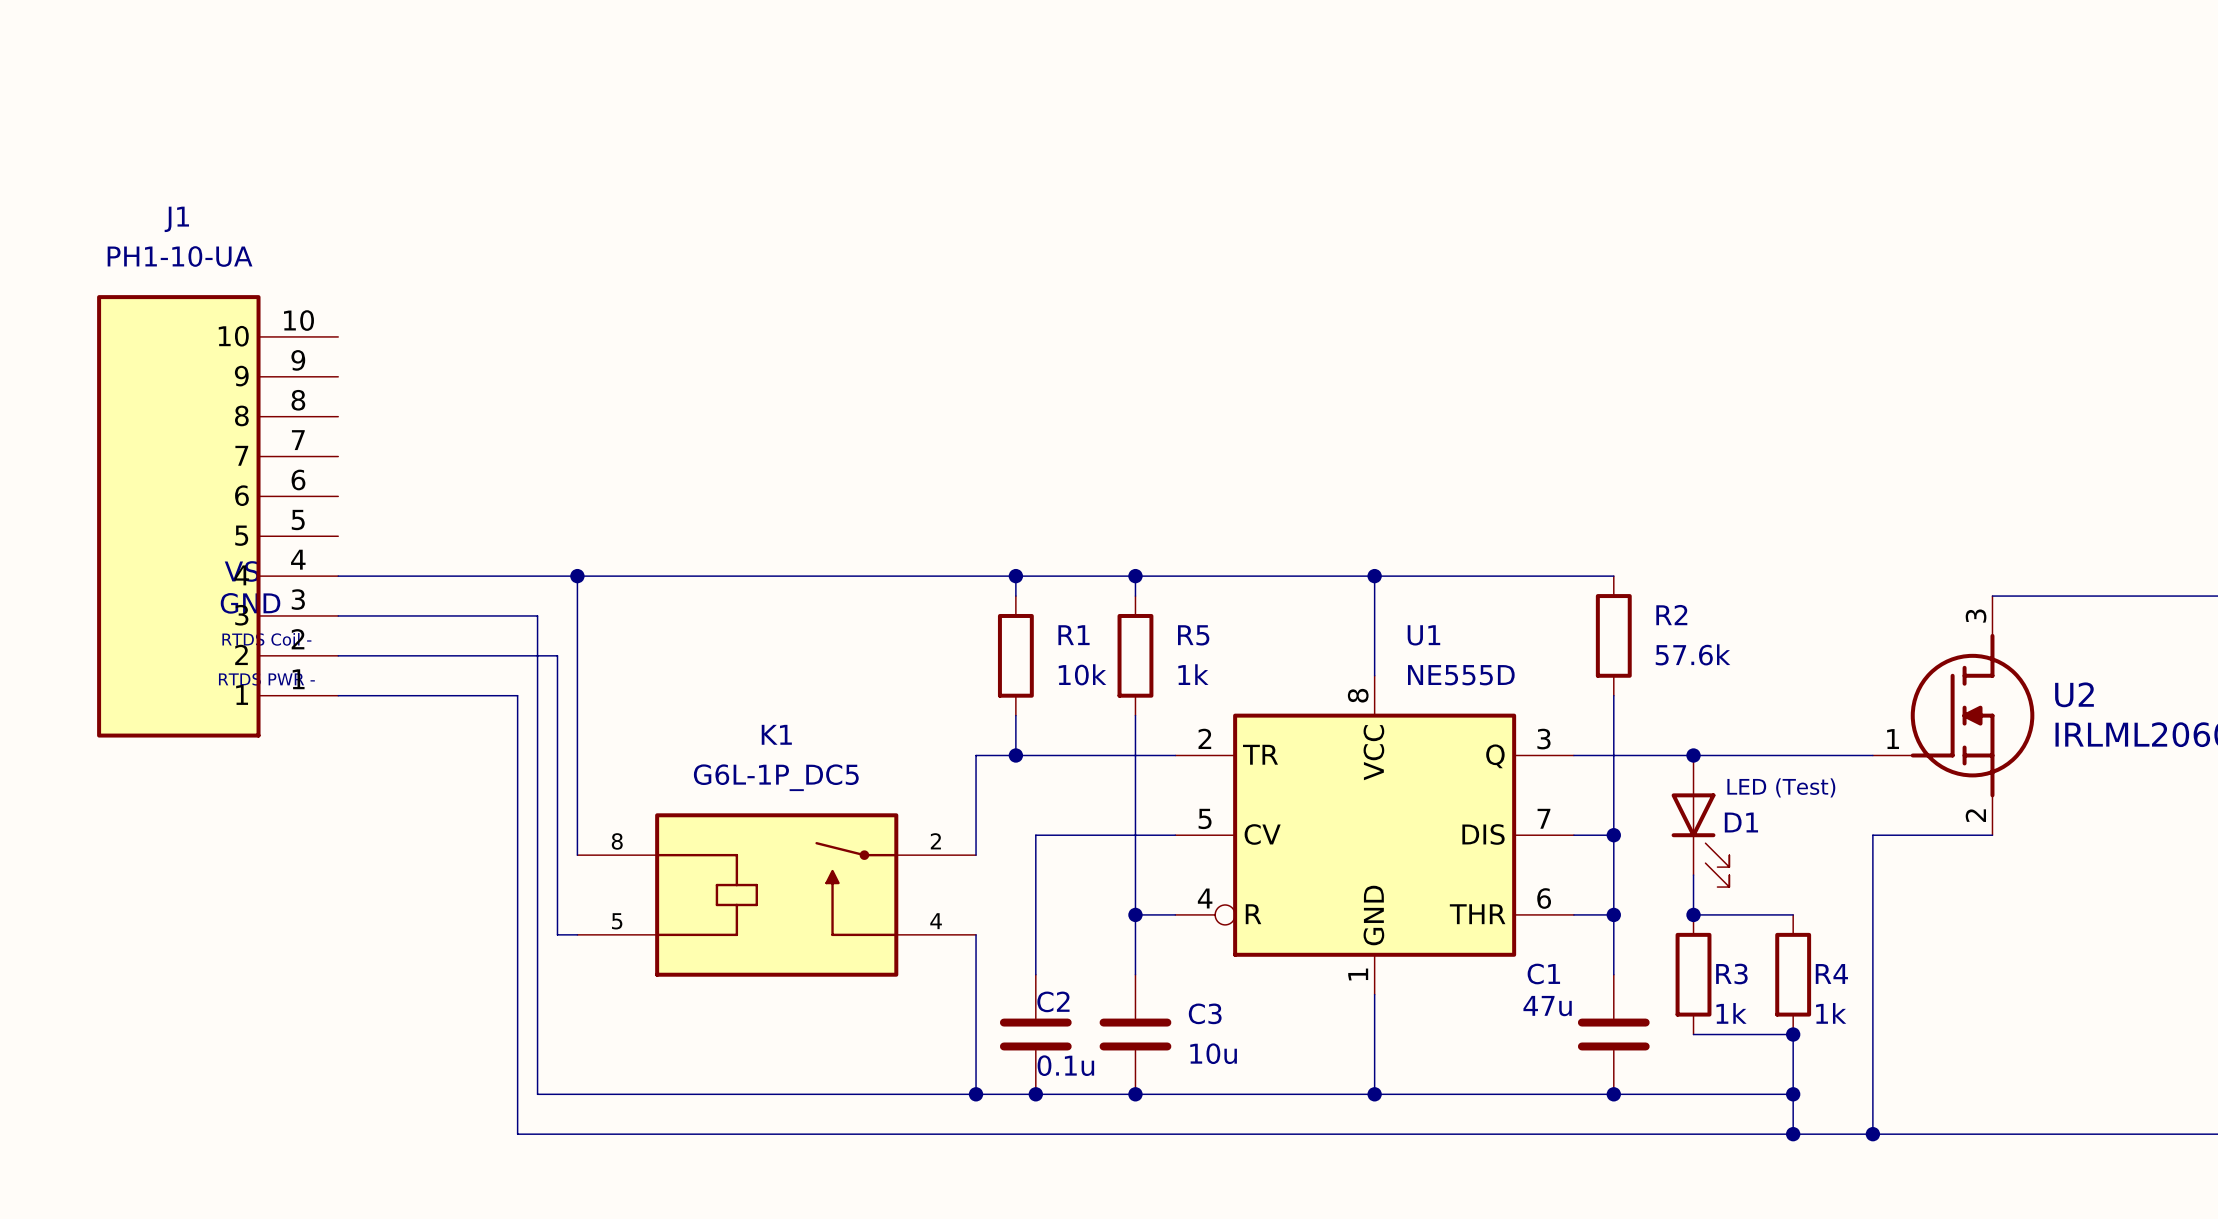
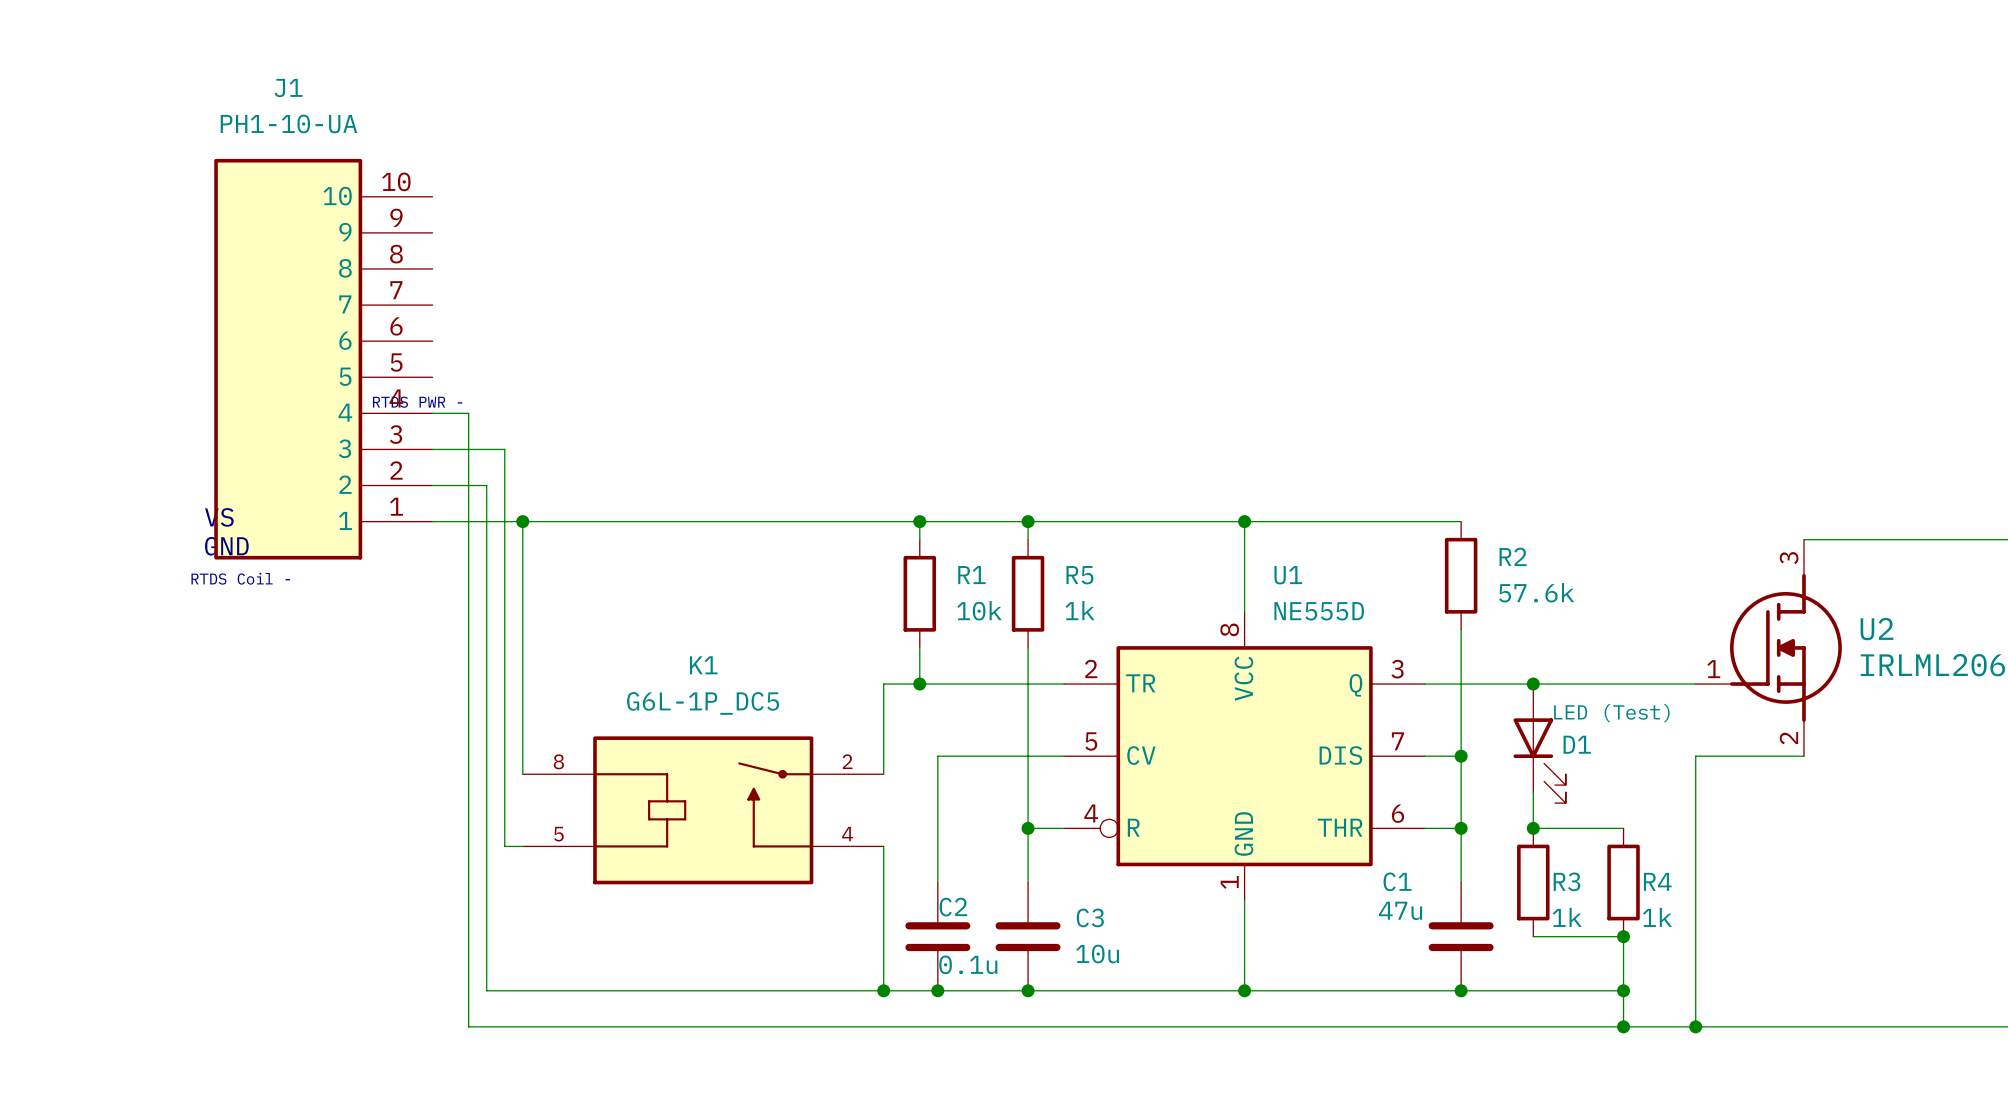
J1 position: (217, 516) -> (323, 359)
wire: (338, 615) (537, 615) -> (432, 485) (486, 485) (486, 557)
wire: (338, 655) (557, 655) -> (432, 449) (504, 449) (504, 593)
text position: RTDS PWR - (266, 679) -> RTDS PWR - (417, 402)
wire: (338, 695) (517, 695) -> (432, 413) (468, 413) (468, 629)

